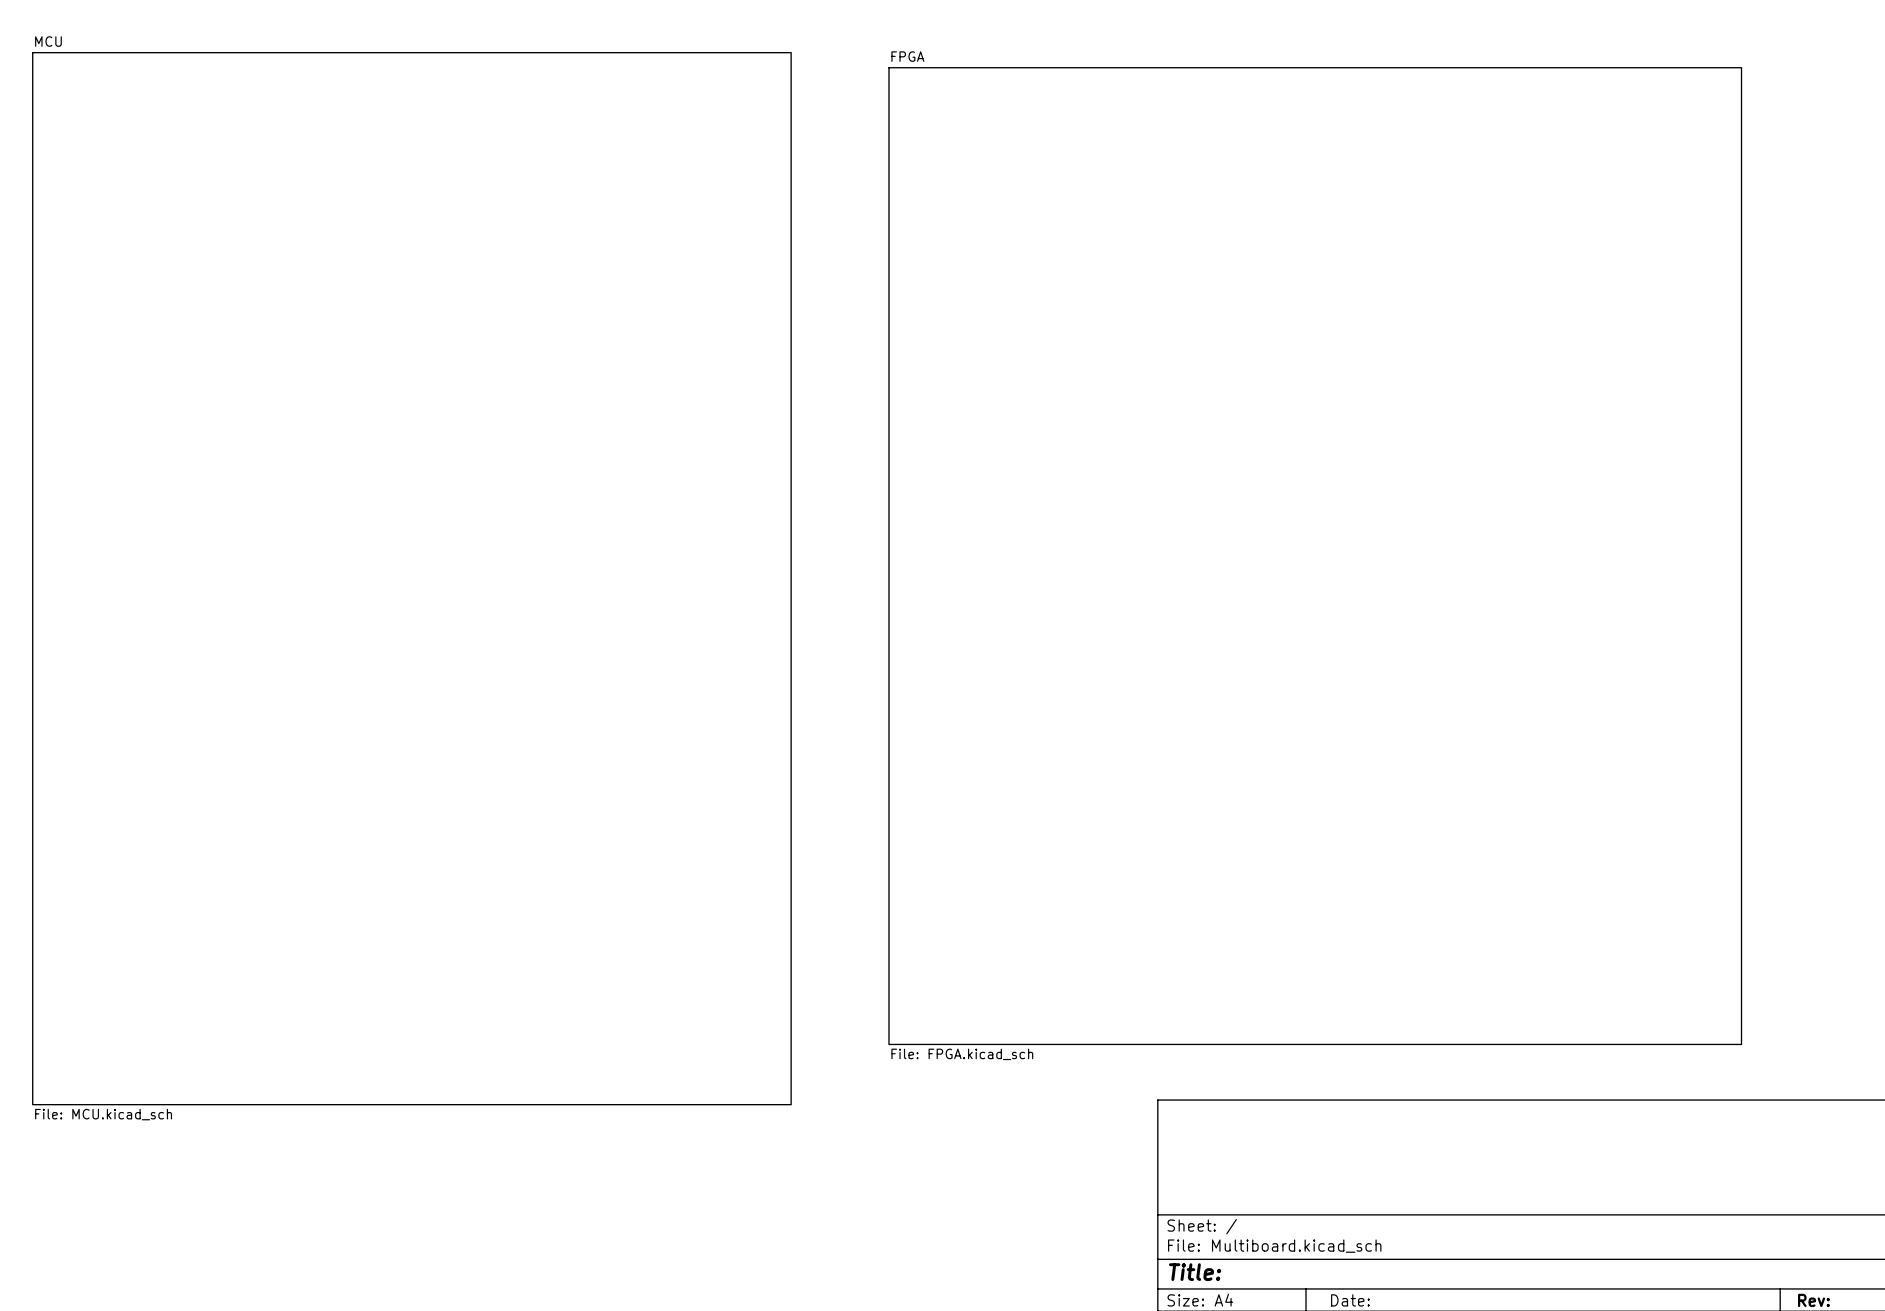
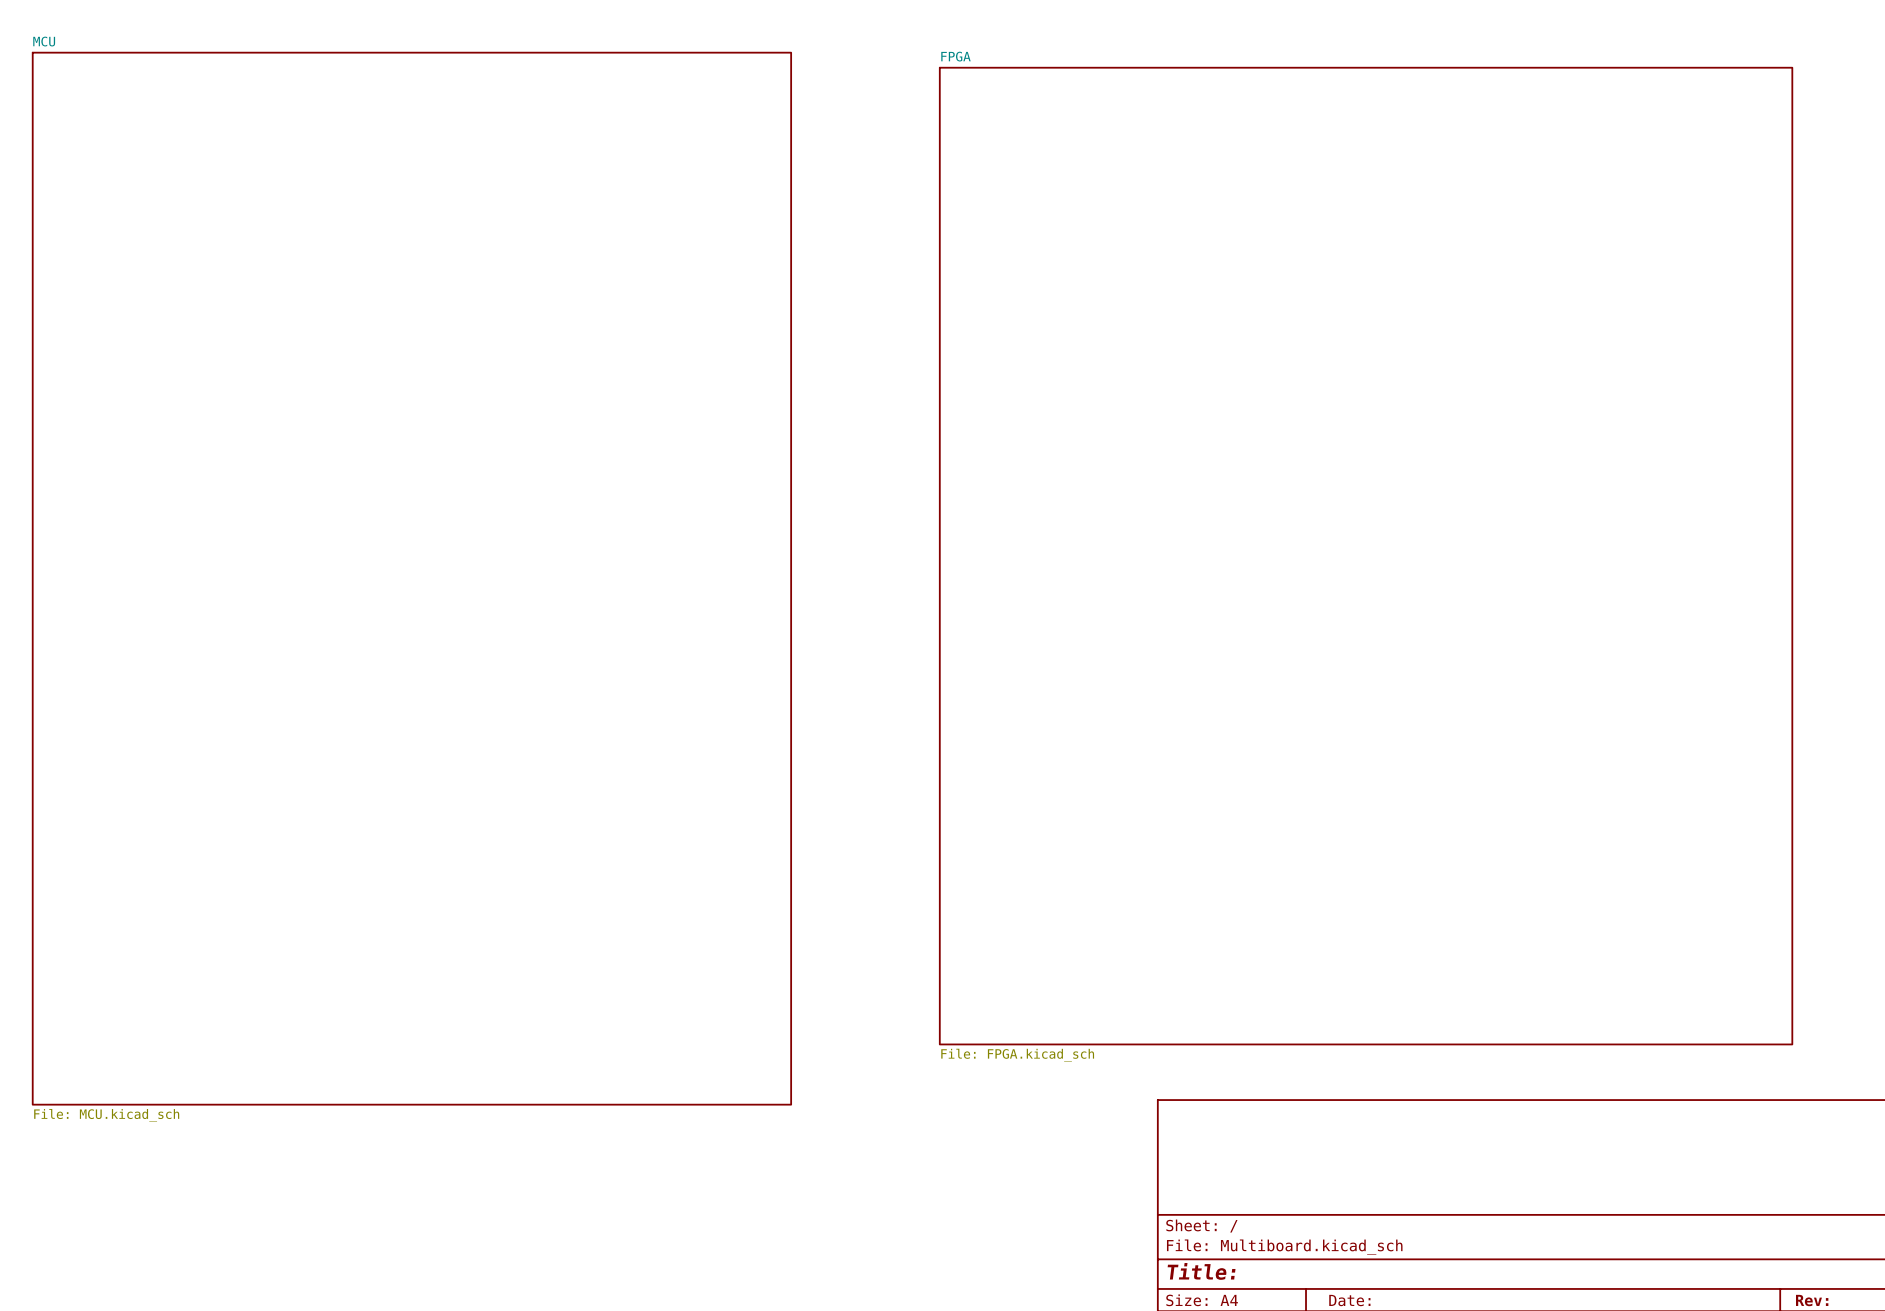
sheet FPGA position: (1315, 556) -> (1366, 556)

